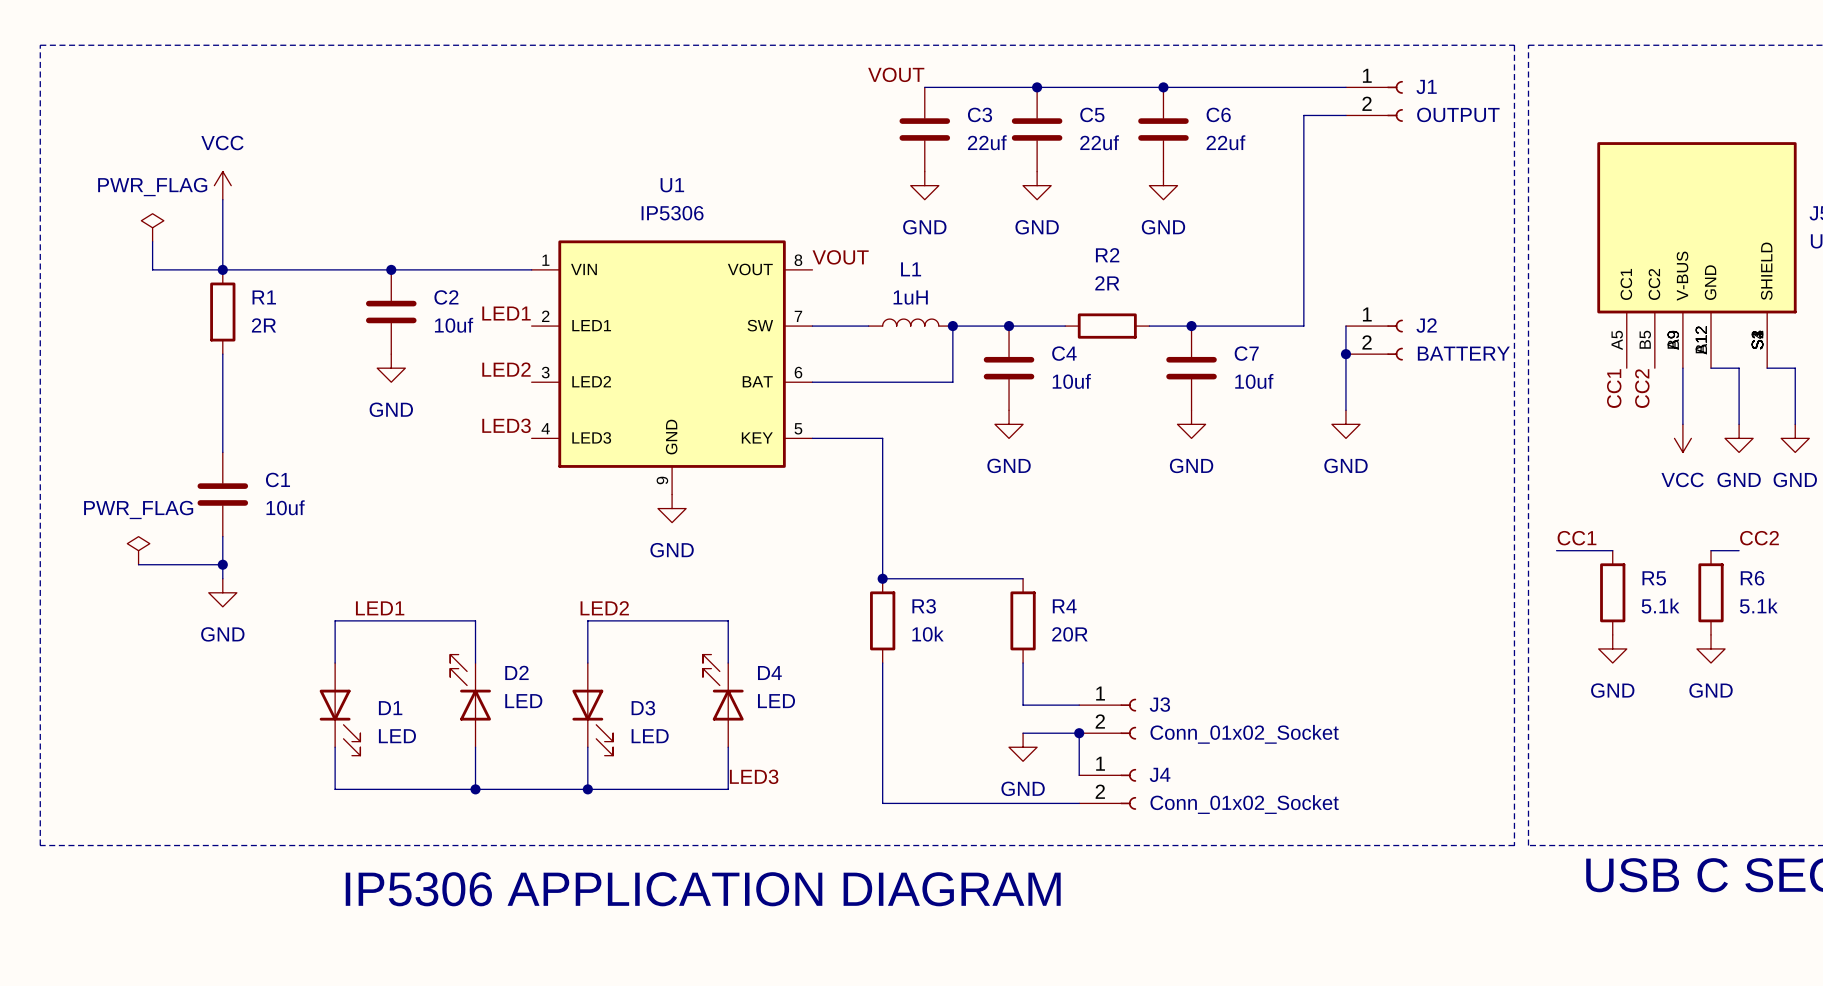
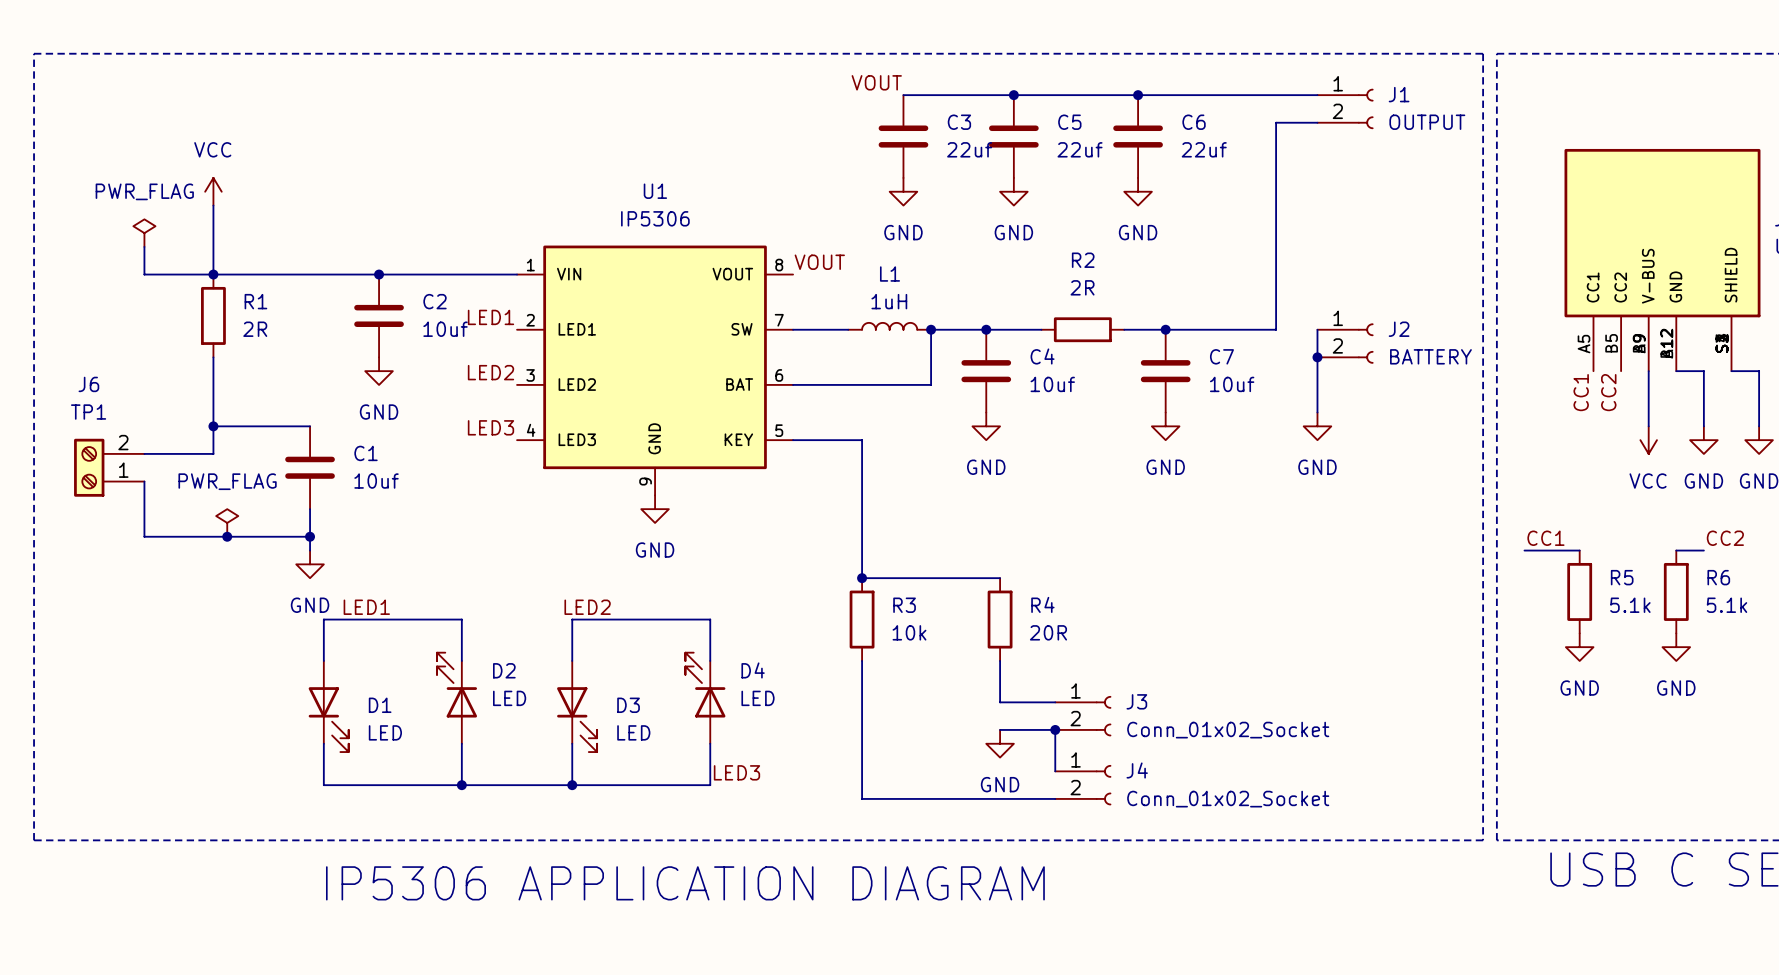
wire: none -> (213, 426) (310, 426)
junction: none -> (213, 426)
wire: none -> (144, 453) (213, 453)
J6: none -> TP1 (109, 467)
wire: none -> (144, 481) (144, 536) (310, 536)
C1 position: (222, 494) -> (310, 467)
wire: (222, 536) (222, 578) -> (310, 509) (310, 550)
junction: none -> (310, 536)
power symbol position: PWR_FLAG (138, 550) -> PWR_FLAG (227, 522)
wire: (138, 564) (222, 564) -> none
junction position: (222, 564) -> (227, 536)
power symbol position: GND (222, 592) -> GND (310, 564)

